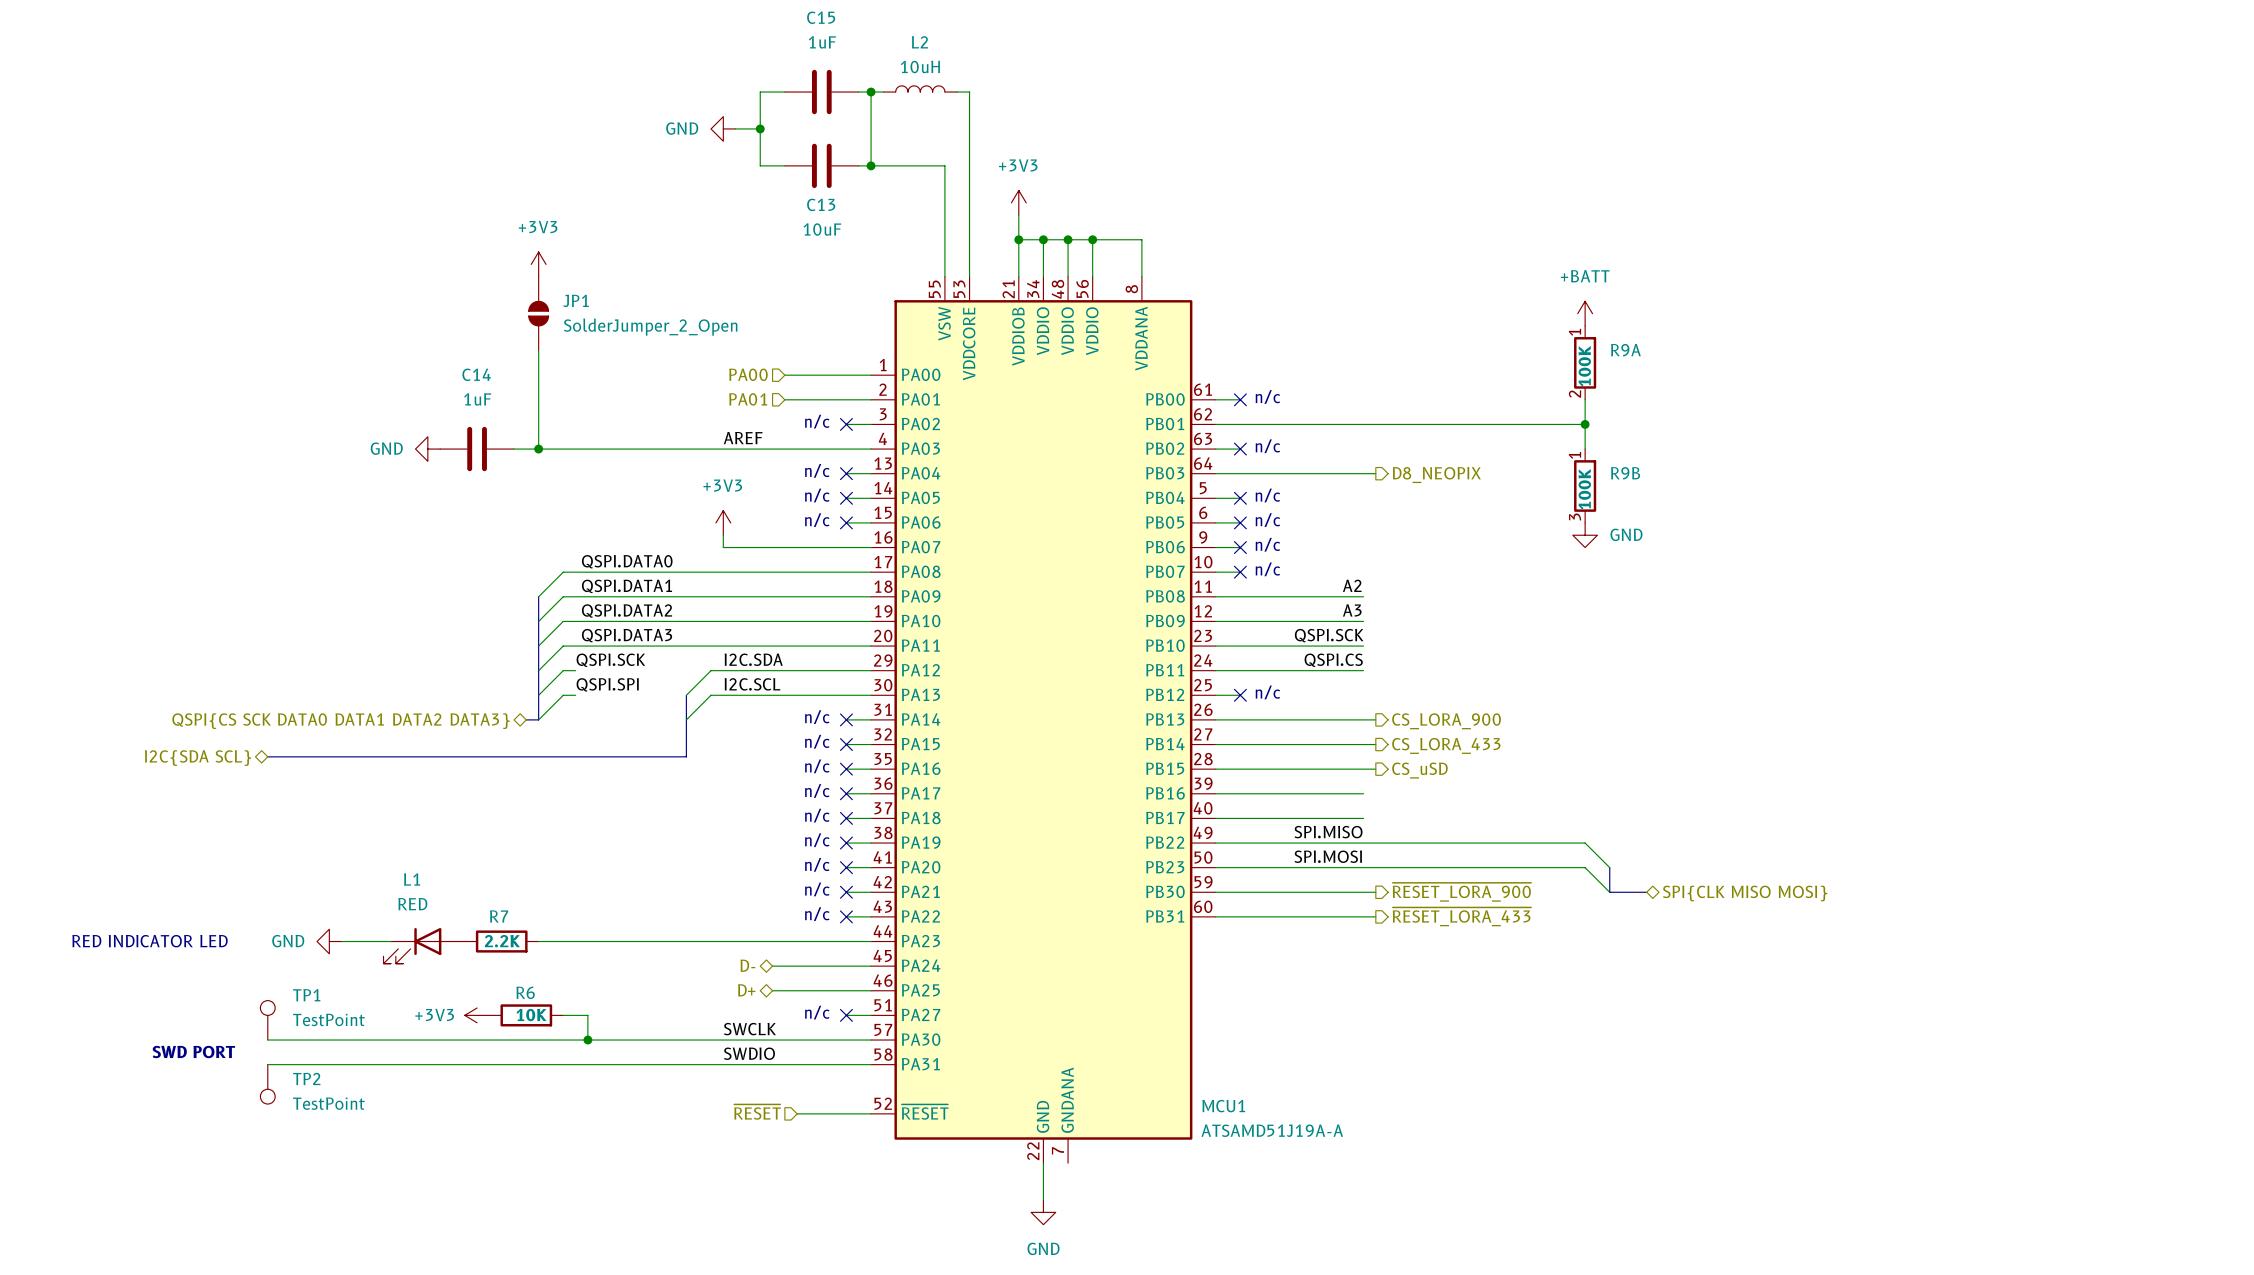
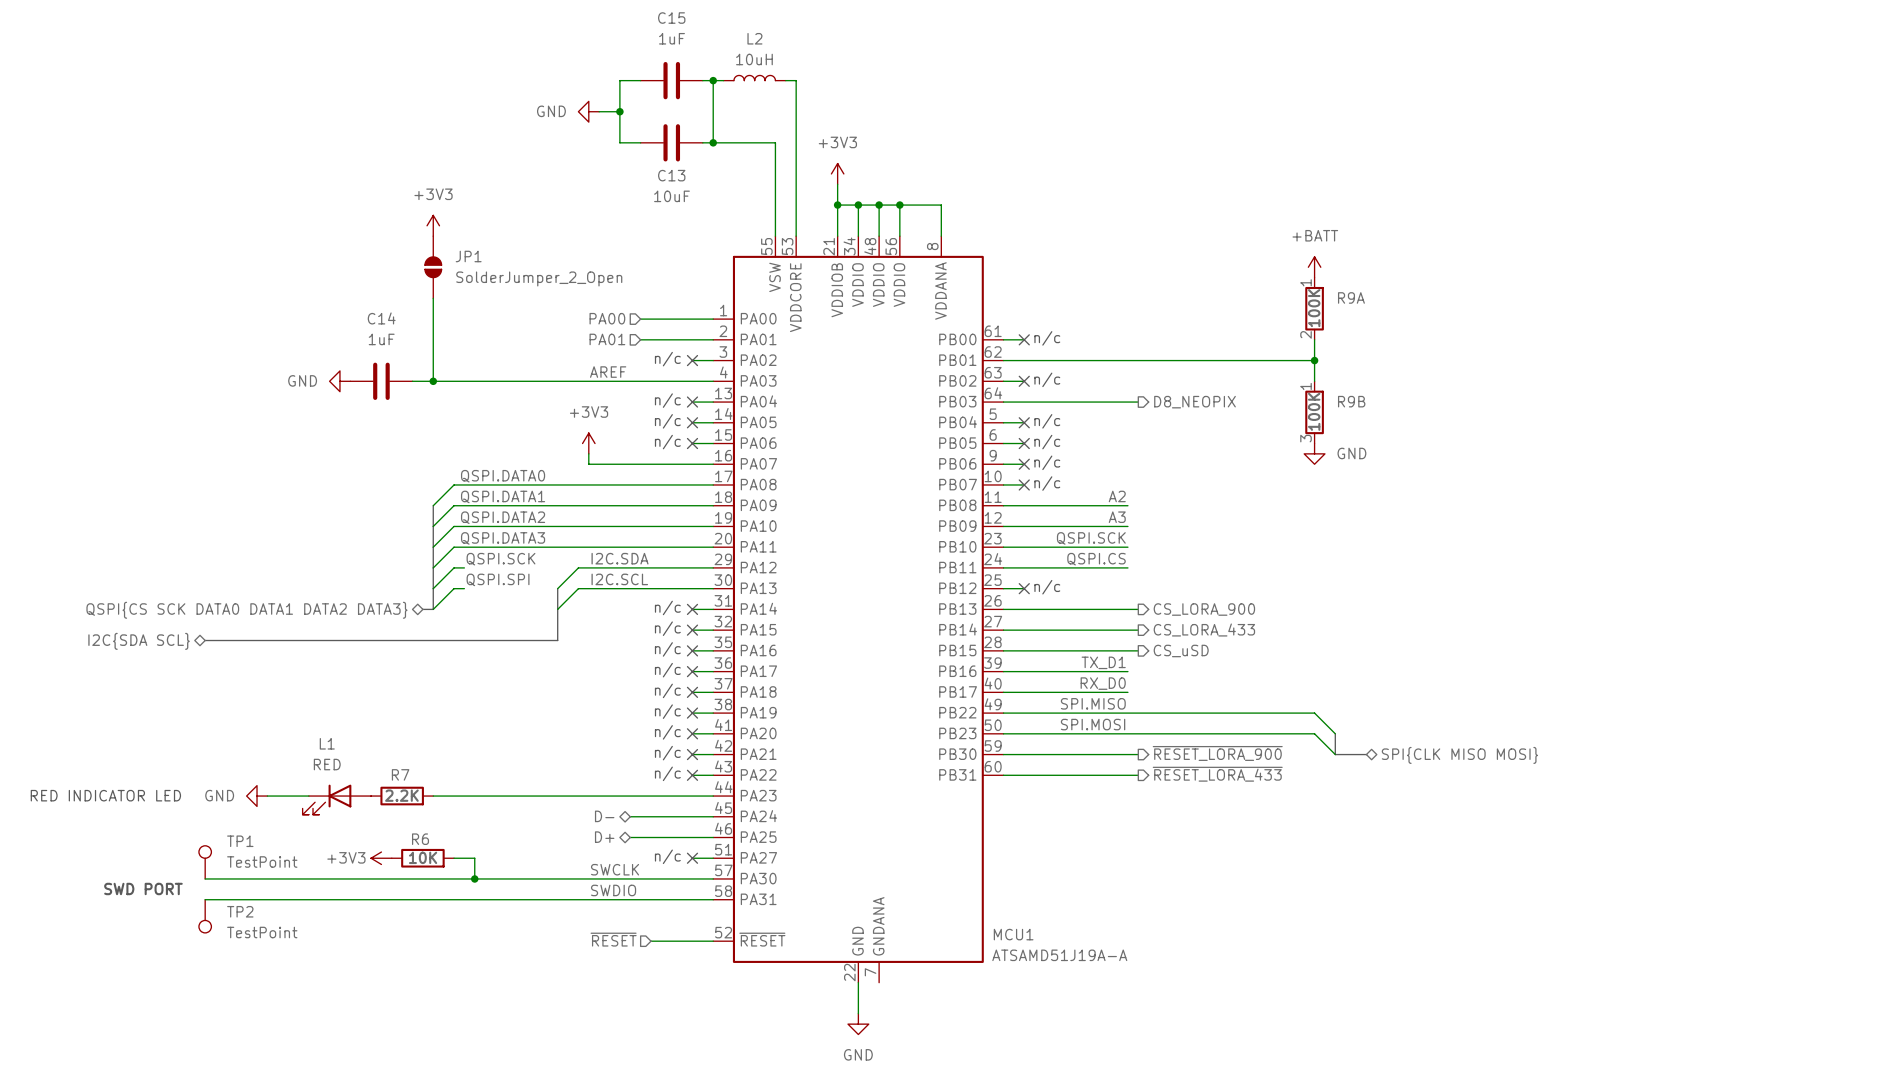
label: none -> TX_D1 (1103, 662)
label: none -> RX_D0 (1103, 683)

